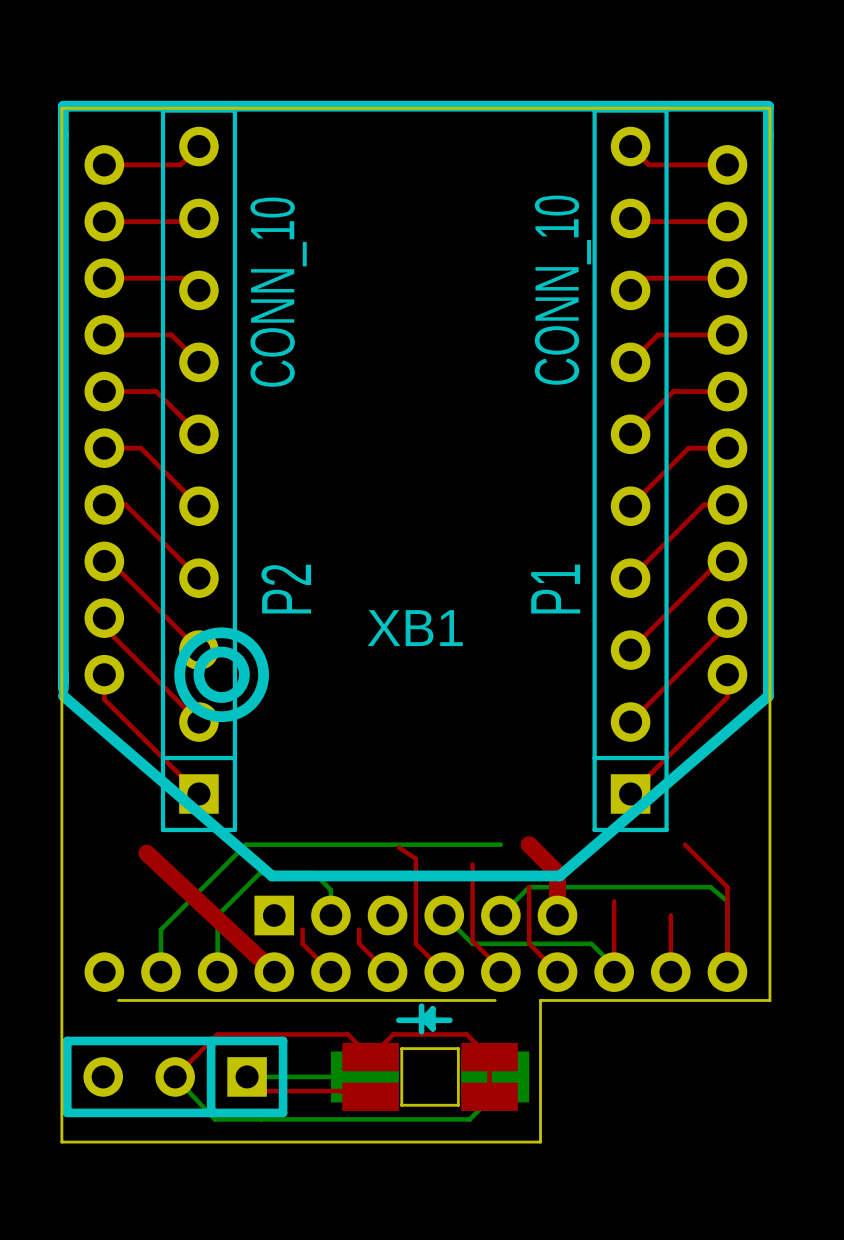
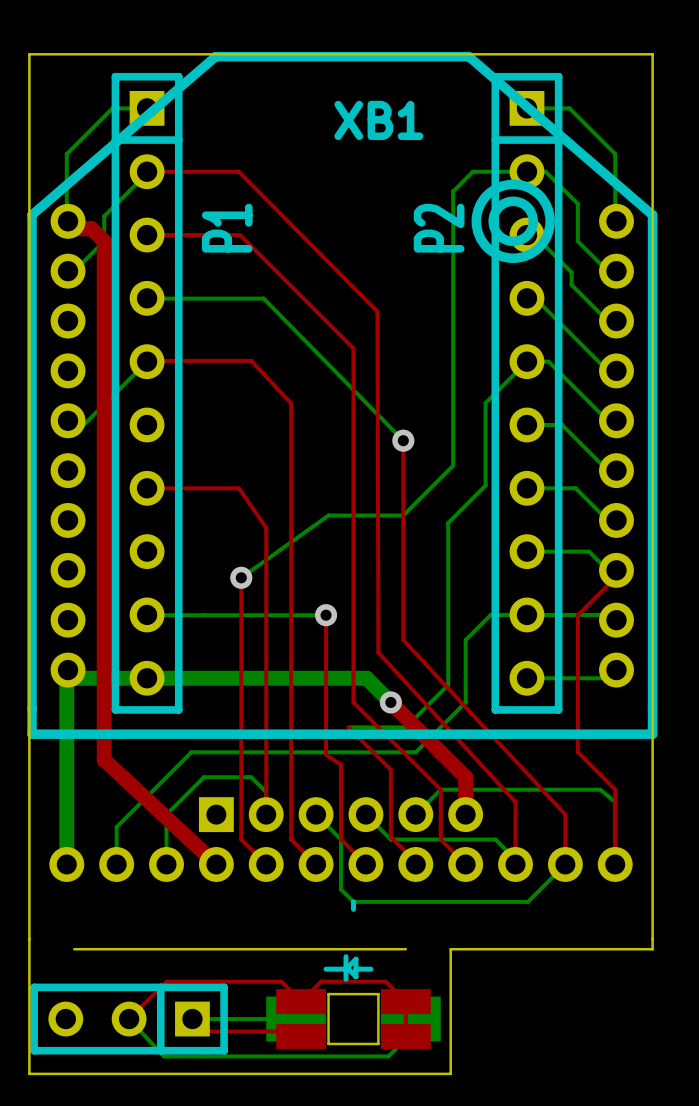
XB1 footprint: [58, 100, 774, 882] -> [27, 51, 658, 739]
board edge: (61, 108) (769, 108) -> (29, 104) (29, 54) (652, 54) (652, 104)
P2 footprint: [160, 108, 238, 833] -> [491, 72, 563, 714]
P1 footprint: [592, 108, 669, 833] -> [111, 72, 183, 714]
bottom track: none -> (147, 108) (112, 108) (66, 154) (66, 228)
bottom track: none -> (526, 108) (569, 108) (615, 154) (615, 228)
top track: (198, 146) (180, 164) (104, 164) -> none
top track: (630, 146) (648, 164) (727, 164) -> none
top track: none -> (147, 171) (238, 171) (377, 311)
bottom track: none -> (147, 171) (104, 216) (104, 241) (66, 278)
top track: (630, 218) (633, 221) (727, 221) -> none
top track: (104, 221) (195, 221) -> none
top track: none -> (66, 228) (91, 228) (104, 241) (104, 759)
top track: none -> (147, 231) (147, 235) (240, 235) (353, 348) (353, 702) (440, 789)
bottom track: none -> (526, 235) (534, 235) (571, 272) (571, 284) (615, 328)
top track: (104, 278) (186, 278) (198, 290) -> none
top track: (727, 278) (642, 278) (630, 290) -> none
P1 value: CONN_10 (562, 290) -> none
P2 value: CONN_10 (278, 292) -> none
bottom track: none -> (615, 278) (577, 241) (577, 203) (545, 171) (472, 171) (453, 191) (453, 465) (403, 515) (328, 515) (241, 577)
bottom track: none -> (526, 298) (535, 298) (615, 378)
bottom track: none -> (149, 298) (263, 298) (403, 440)
top track: (104, 334) (171, 334) (198, 362) -> none
top track: (727, 334) (658, 334) (630, 362) -> none
top track: none -> (377, 312) (378, 652) (515, 802)
top track: (104, 391) (156, 391) (198, 434) -> none
top track: (727, 391) (673, 391) (630, 434) -> none
bottom track: none -> (147, 361) (80, 428)
top track: none -> (148, 360) (251, 360) (291, 403) (291, 827)
top track: (104, 448) (140, 448) (198, 506) -> none
top track: (727, 448) (688, 448) (630, 506) -> none
bottom track: none -> (526, 424) (562, 424) (615, 478)
bottom track: none -> (615, 428) (548, 361) (526, 361) (485, 403) (485, 485) (448, 522) (448, 684) (405, 727) (348, 727)
top track: none -> (403, 440) (403, 640) (565, 814)
via: none -> (403, 440)
top track: (104, 504) (125, 504) (198, 578) -> none
top track: (727, 504) (703, 504) (630, 578) -> none
top track: none -> (147, 488) (239, 488) (266, 527) (266, 814)
bottom track: none -> (526, 488) (575, 488) (615, 527)
top track: (104, 561) (110, 561) (198, 650) -> none
top track: (727, 561) (719, 561) (630, 650) -> none
P2 name position: P2 (286, 589) -> P2 (439, 228)
P1 name position: P1 (555, 589) -> P1 (227, 228)
bottom track: none -> (526, 551) (589, 551) (615, 577)
top track: (104, 618) (104, 627) (198, 722) -> none
top track: (727, 618) (727, 625) (630, 722) -> none
XB1 name position: XB1 (415, 628) -> XB1 (378, 120)
top track: none -> (241, 577) (241, 827)
via: none -> (241, 577)
top track: none -> (615, 577) (577, 615) (577, 752)
top track: (104, 674) (104, 699) (198, 793) -> none
top track: (727, 674) (727, 697) (630, 793) -> none
bottom track: none -> (147, 615) (326, 615)
top track: none -> (326, 615) (326, 754)
via: none -> (326, 615)
bottom track: none -> (615, 627) (602, 614) (490, 614) (465, 640) (465, 702) (415, 752)
bottom track: none -> (615, 677) (526, 678)
top track: none -> (390, 702) (440, 752)
bottom track: none -> (390, 702) (366, 678) (66, 677) (66, 864)
via: none -> (390, 702)
top track: none -> (348, 727) (390, 769)
bottom track: none -> (316, 814) (341, 839) (341, 889) (353, 901) (527, 901) (565, 864)
board edge: (118, 1000) (495, 1000) -> (74, 949) (405, 949)
board edge: (769, 1000) (540, 1000) (540, 1068) -> (652, 889) (652, 949) (450, 949)
line: (421, 1006) (421, 1031) -> (346, 956) (346, 979)
line: (398, 1020) (424, 1020) (432, 1028) (432, 1008) (421, 1020) -> (326, 969) (348, 969) (355, 976) (355, 959) (346, 969)
line: (432, 1020) (449, 1020) -> (355, 969) (370, 969)
board edge: (401, 1048) (401, 1105) (458, 1105) (458, 1048) (401, 1048) -> (328, 994) (328, 1043) (378, 1043) (378, 994) (328, 994)
top track: (175, 1076) (217, 1034) (347, 1034) (370, 1057) (393, 1034) (466, 1034) (489, 1057) (489, 1096) -> (129, 1019) (166, 981) (281, 981) (301, 1001) (321, 981) (385, 981) (405, 1001) (405, 1036)
bottom track: (175, 1076) (214, 1119) (469, 1119) (500, 1088) (500, 1076) -> (129, 1019) (164, 1056) (388, 1056) (415, 1029) (415, 1019)
part position: (175, 1076) -> (129, 1019)
top track: (247, 1076) (257, 1091) (370, 1091) -> (192, 1019) (201, 1031) (301, 1031)
bottom track: (247, 1076) (359, 1076) -> (192, 1019) (291, 1019)
part position: (430, 1076) -> (353, 1019)
board edge: (61, 1142) (540, 1142) -> (29, 1014) (29, 1073) (450, 1073) (450, 1014)

